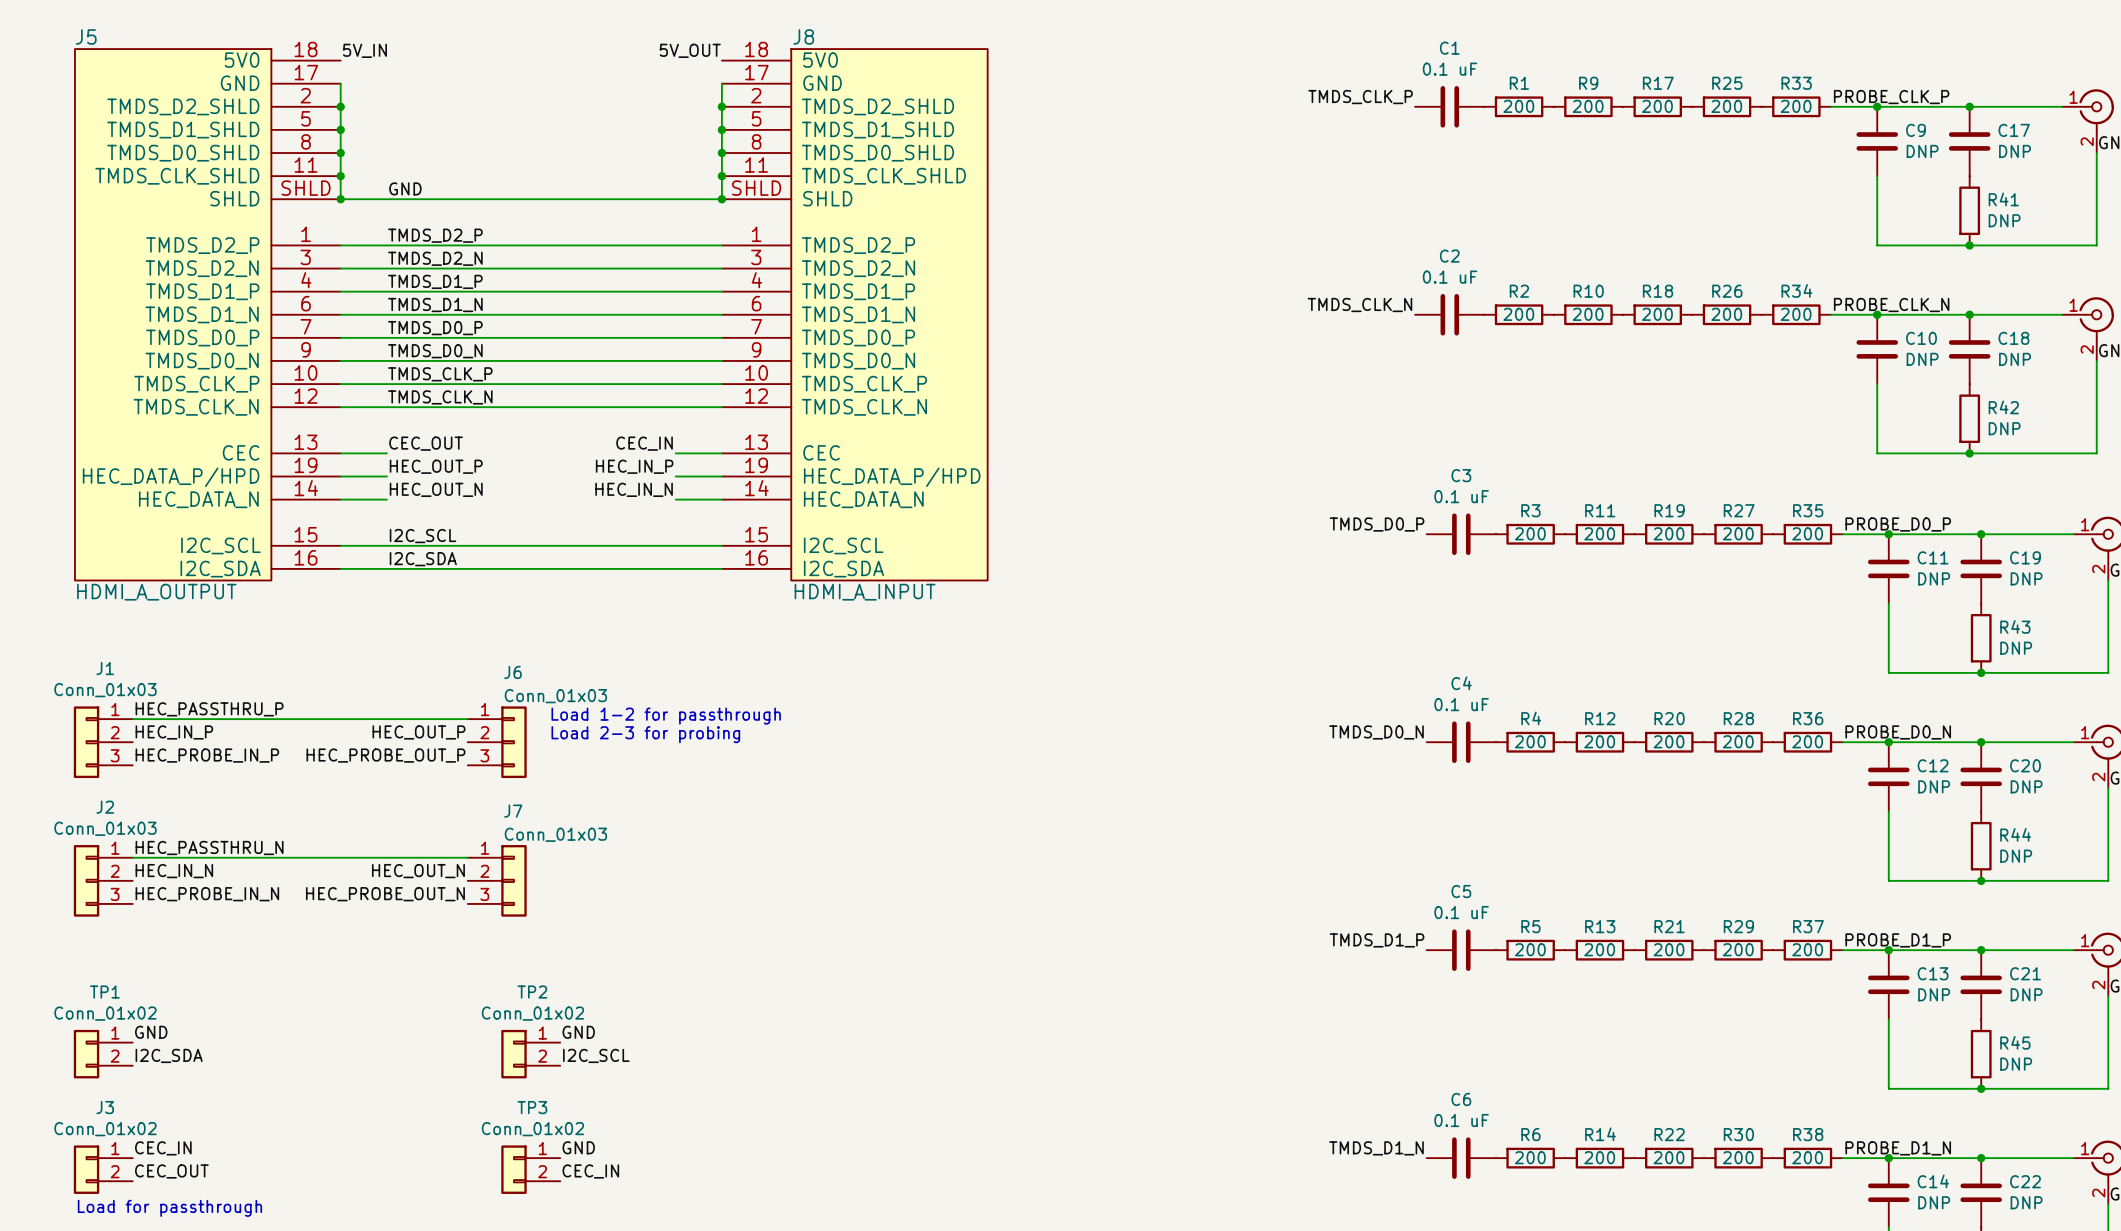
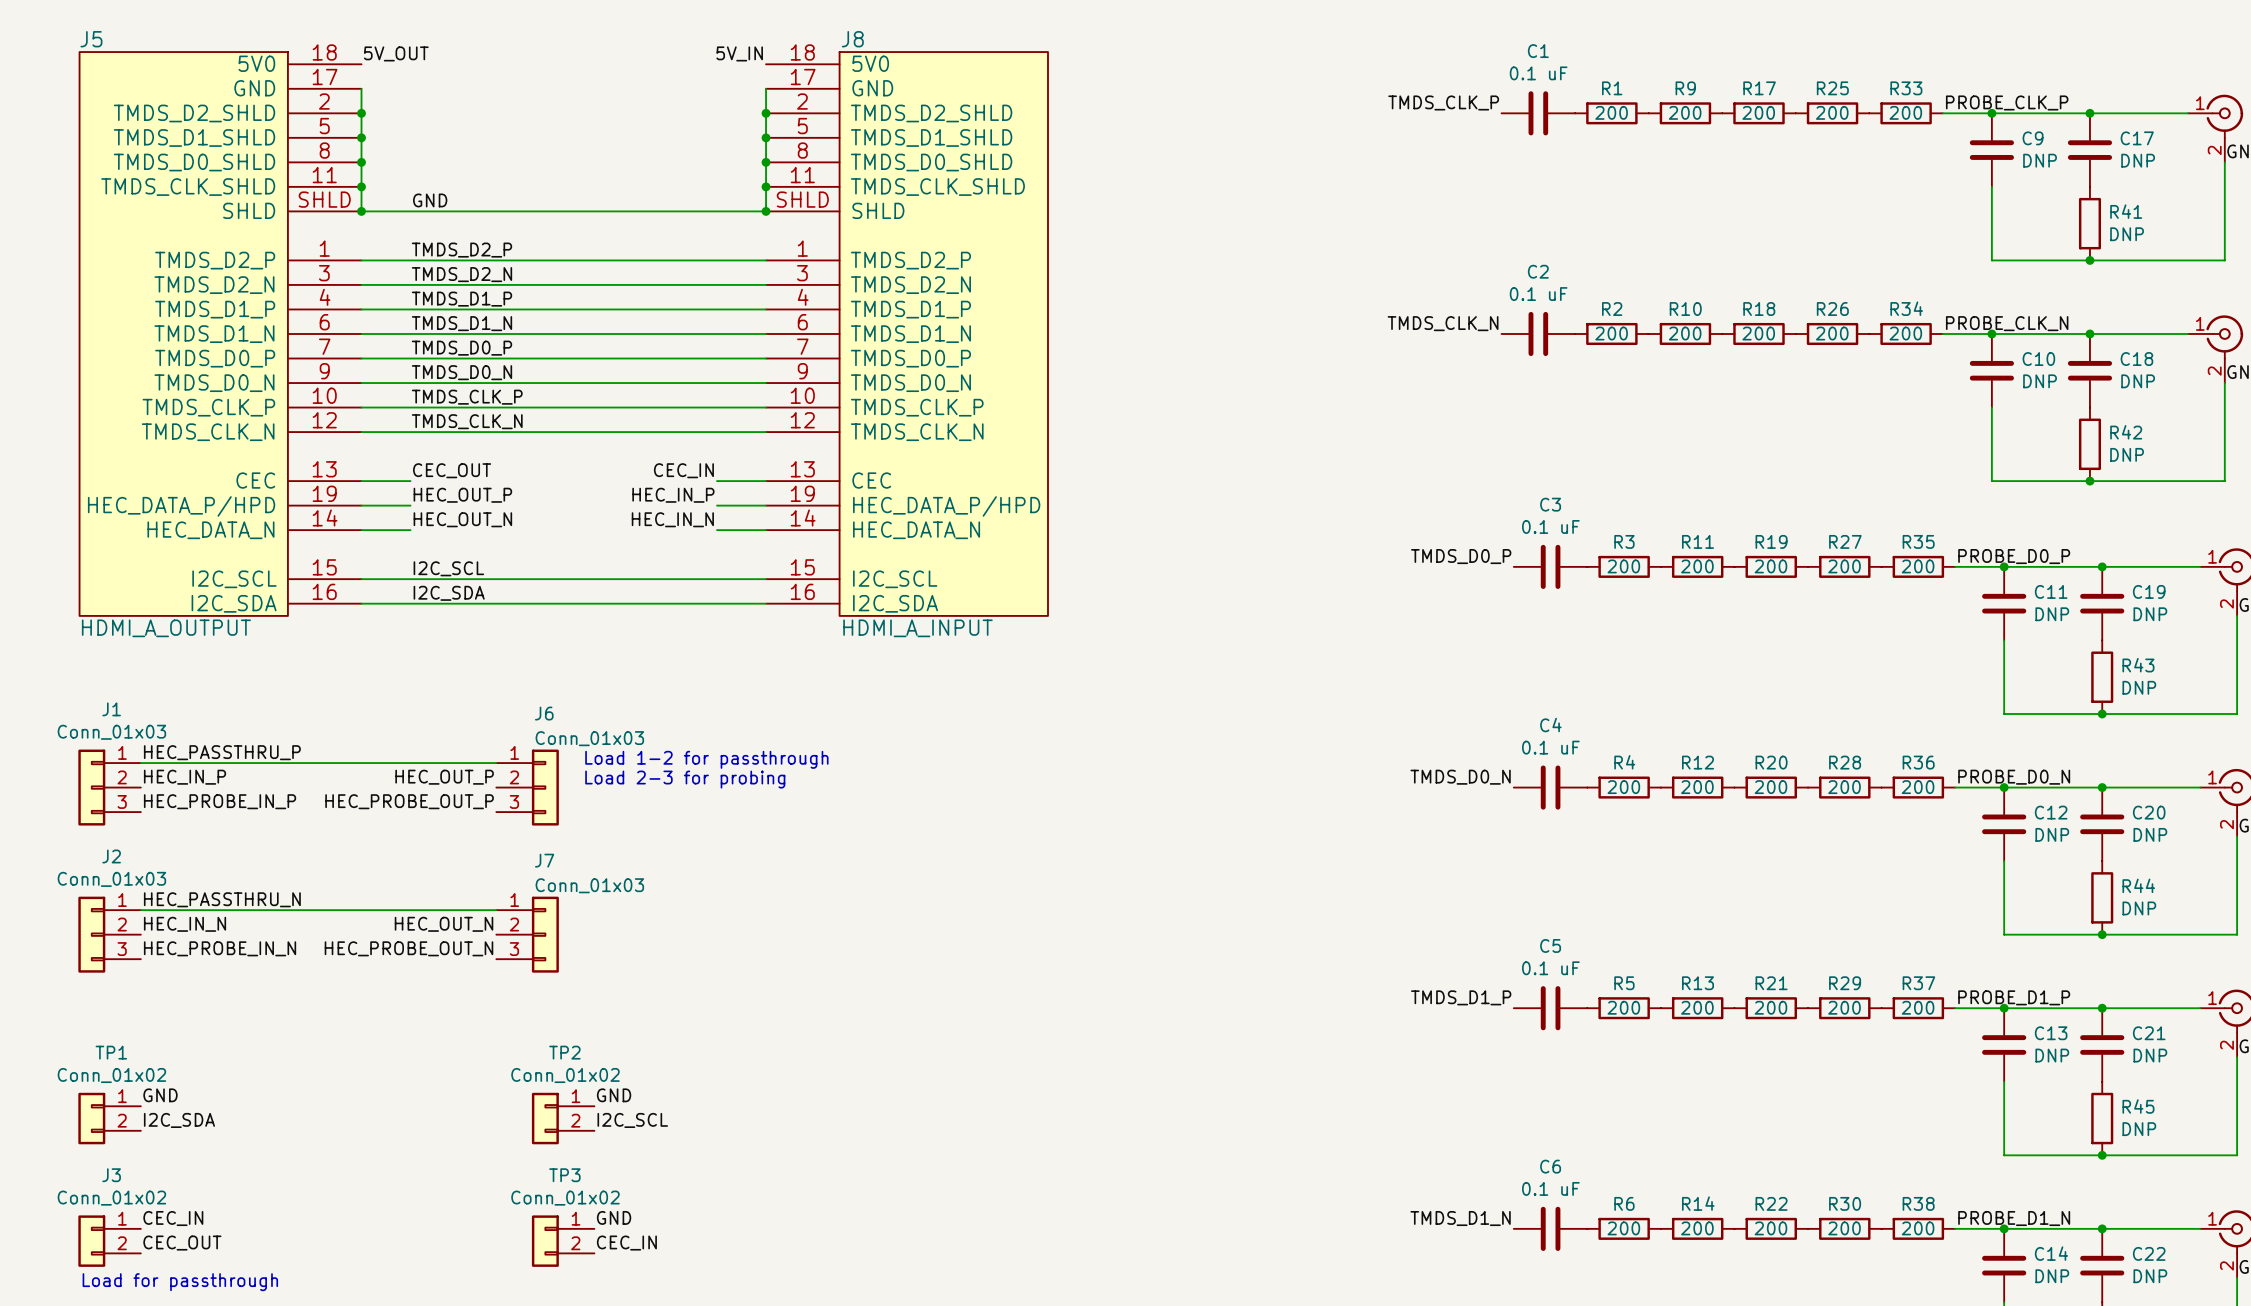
label: 5V_IN (364, 50) -> 5V_OUT (396, 53)
label: 5V_OUT (690, 50) -> 5V_IN (739, 53)

